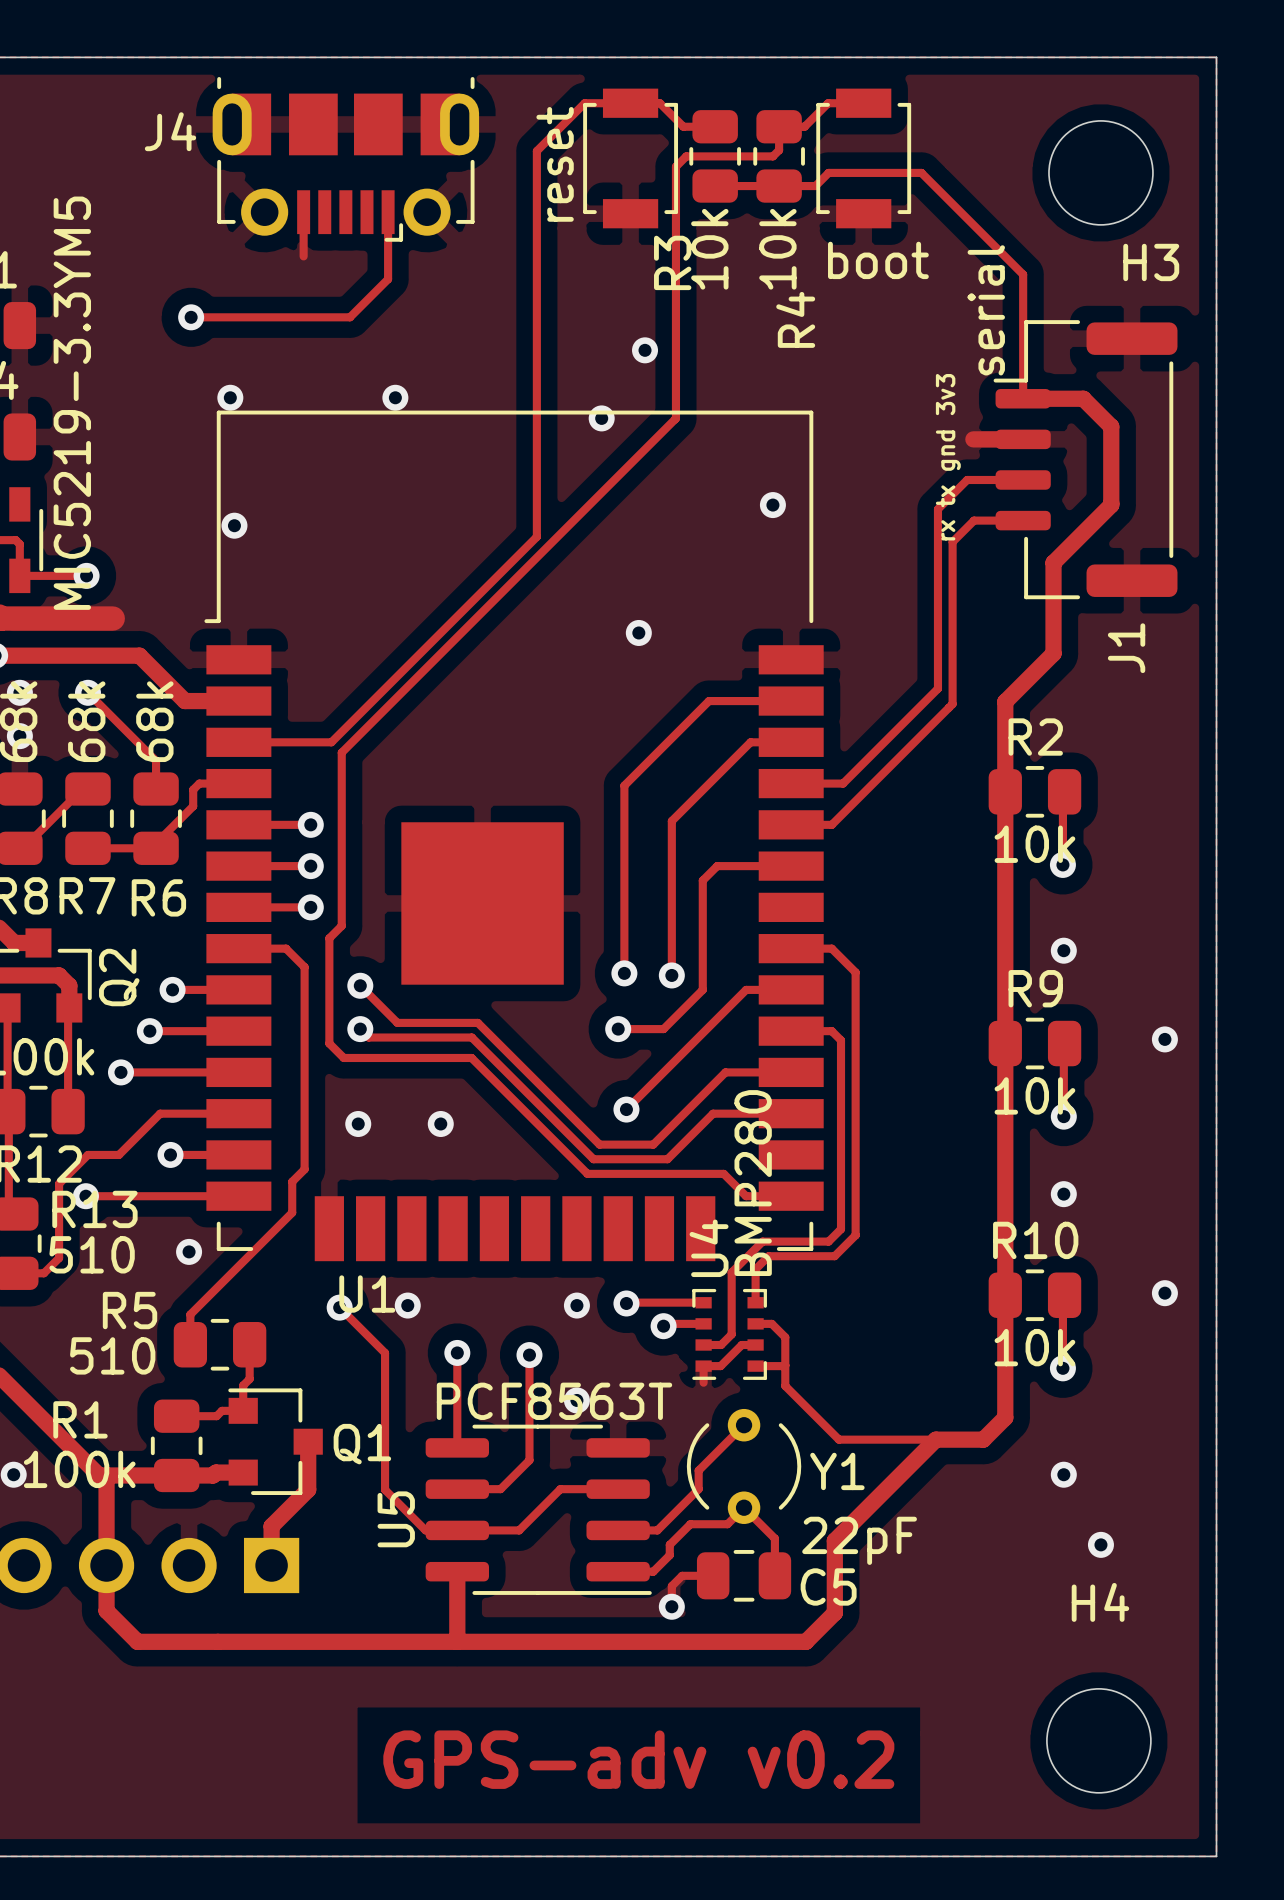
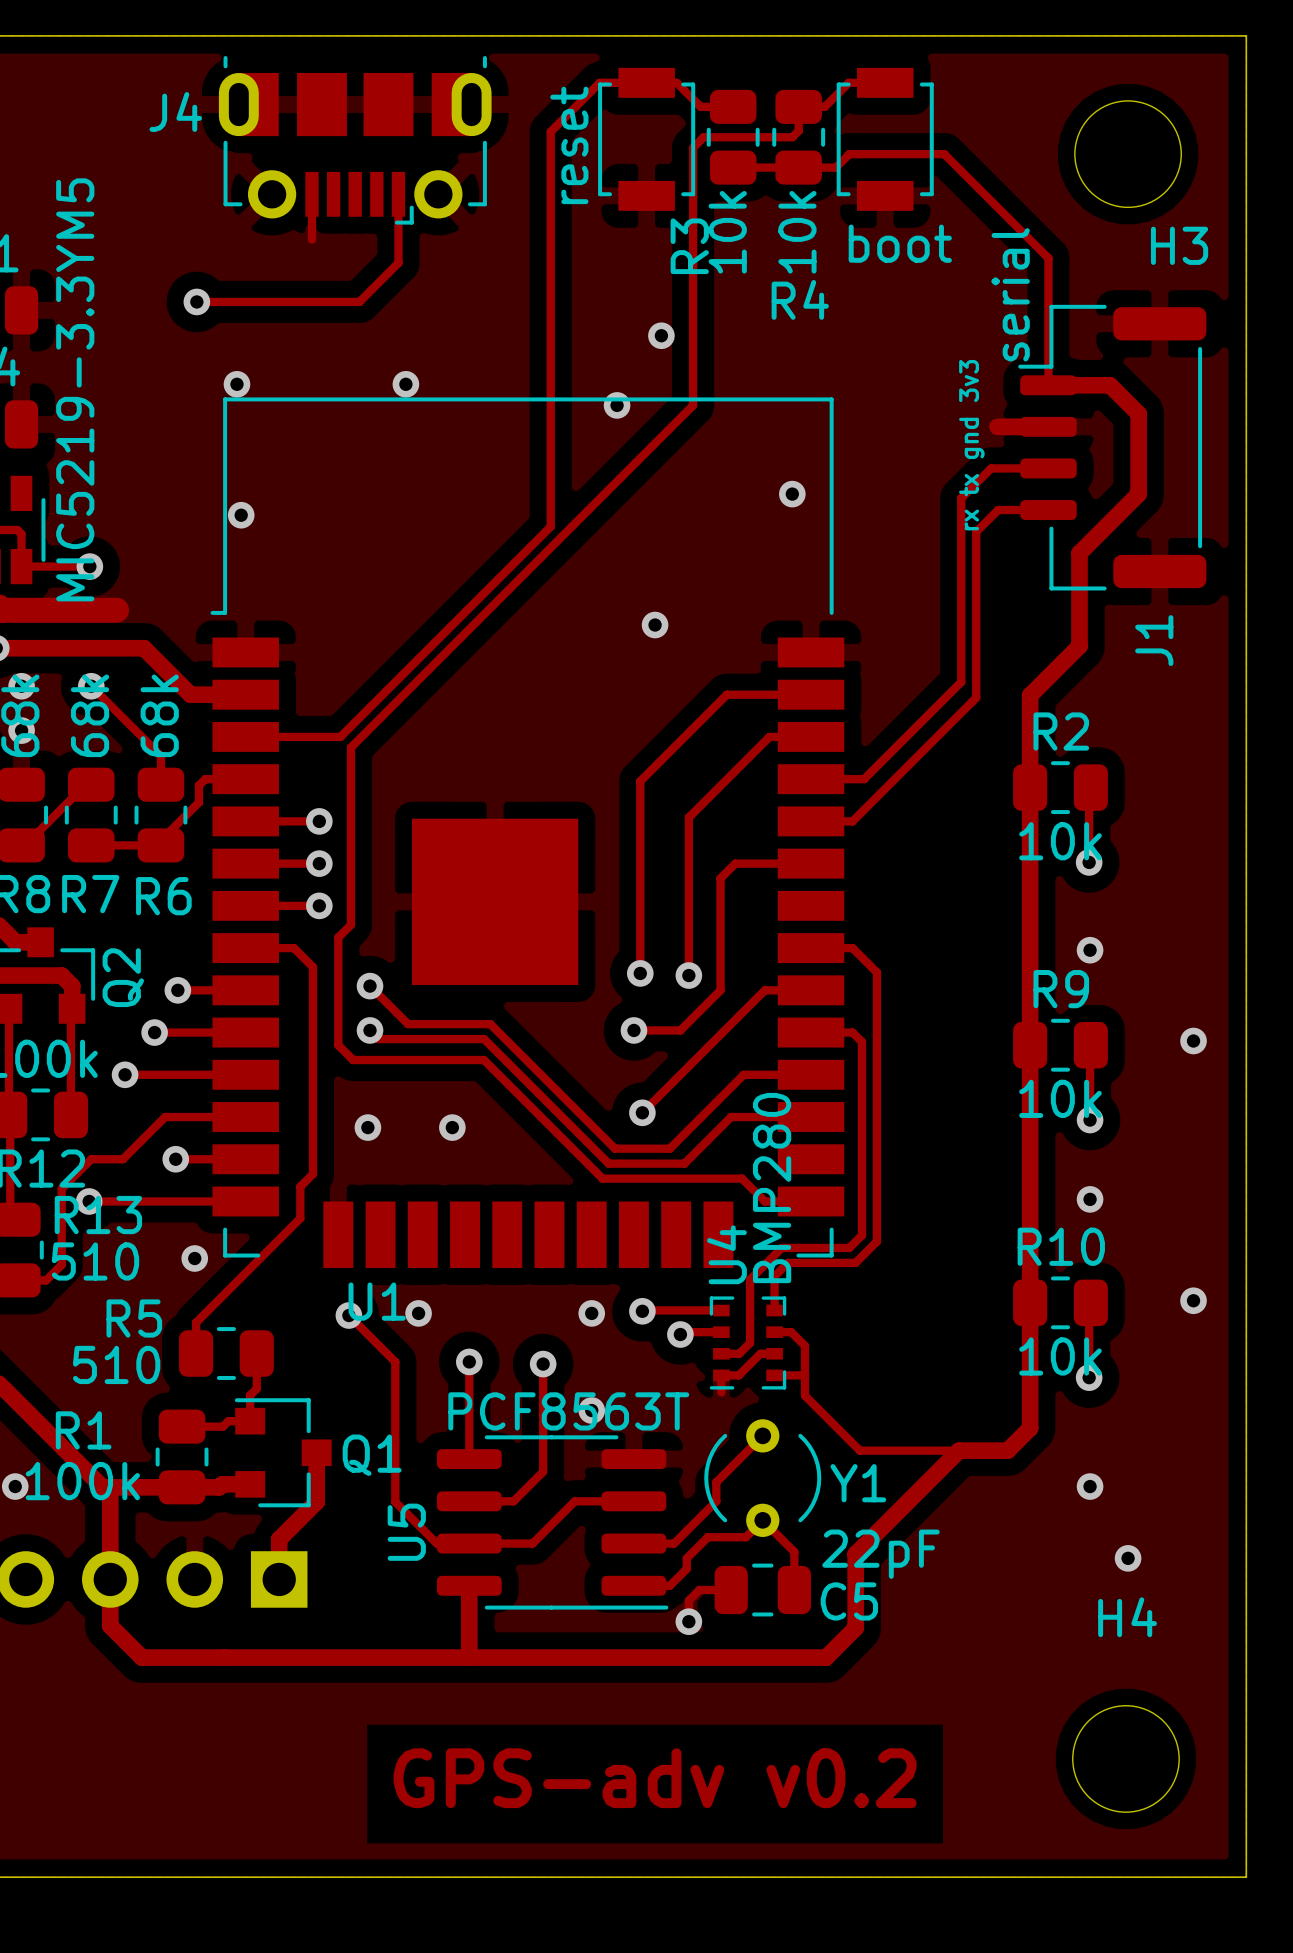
R4 name rotation: 0° (795, 319) -> 90° clockwise (800, 299)

